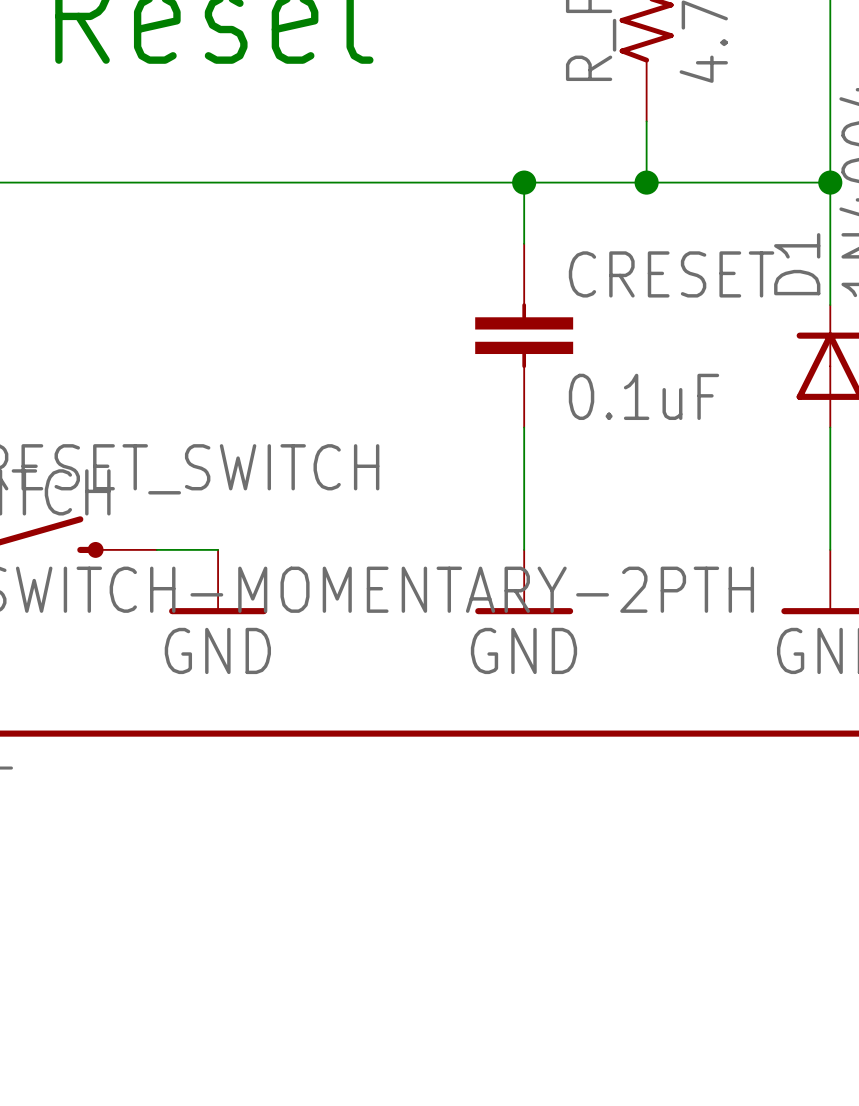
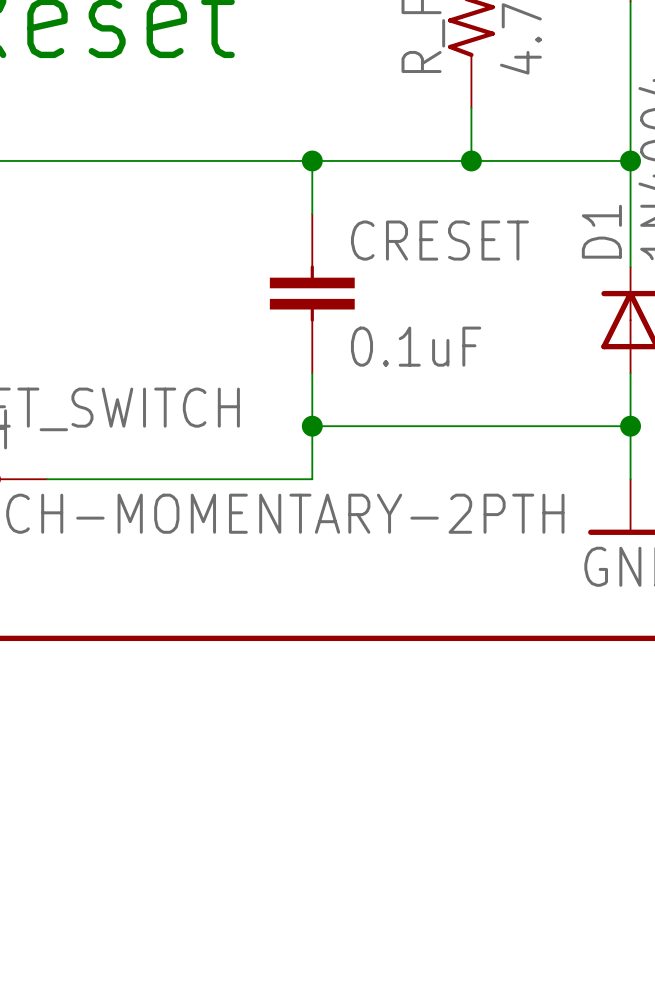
wire: (524, 182) (524, 243) -> (312, 160) (312, 214)
junction position: (524, 182) -> (312, 160)
CRESET position: (524, 335) -> (312, 293)
wire: none -> (312, 373) (312, 479) (100, 479)
wire: (524, 427) (524, 549) -> none
wire: none -> (312, 426) (630, 426)
junction: none -> (312, 426)
junction: none -> (630, 426)
power symbol: GND (218, 582) -> none
power symbol: GND (524, 582) -> none

